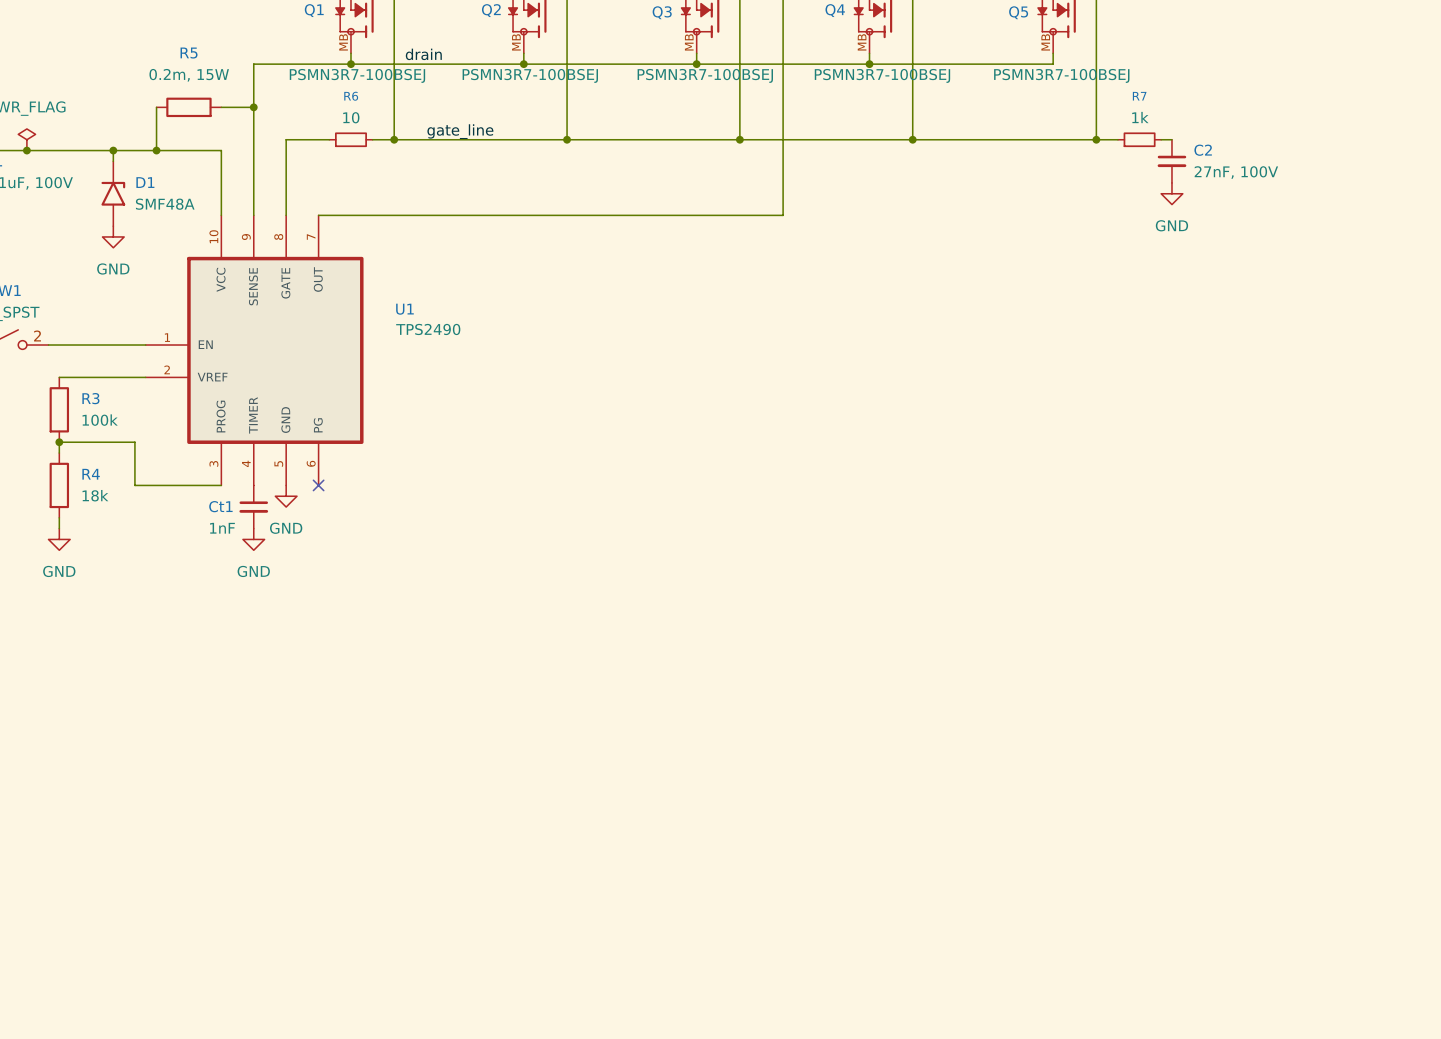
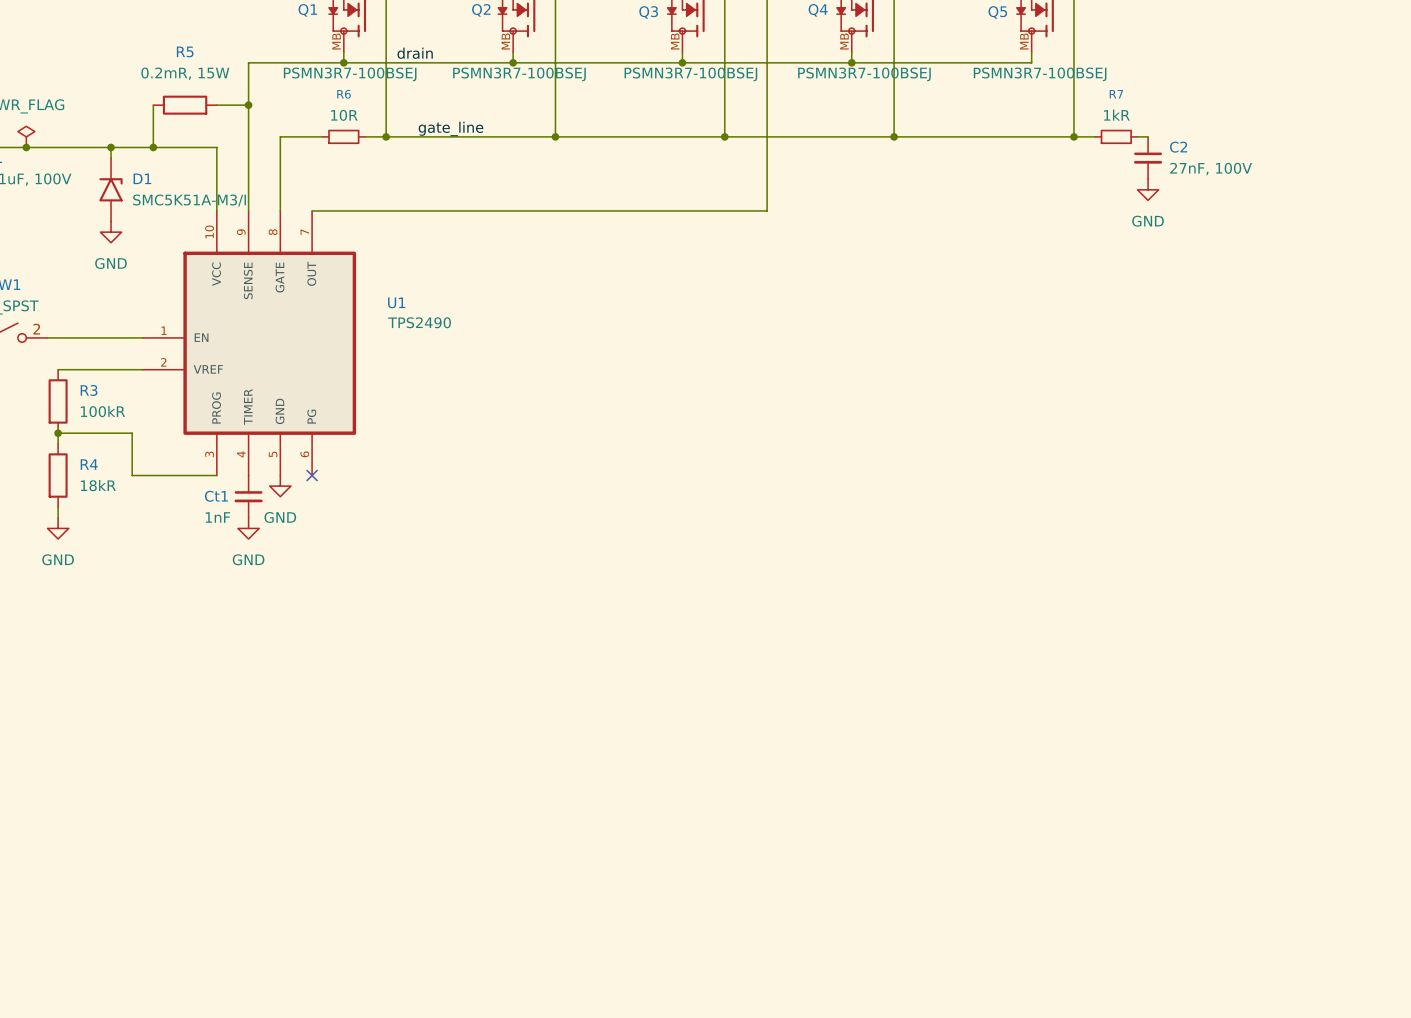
R5 value: 0.2m, 15W (189, 75) -> 0.2mR, 15W (185, 73)
R6 value: 10 (351, 117) -> 10R (344, 115)
R7 value: 1k (1140, 117) -> 1kR (1116, 115)
D1 value: SMF48A (165, 204) -> SMC5K51A-M3/I (189, 200)
R3 value: 100k (100, 420) -> 100kR (102, 411)
R4 value: 18k (95, 495) -> 18kR (98, 485)

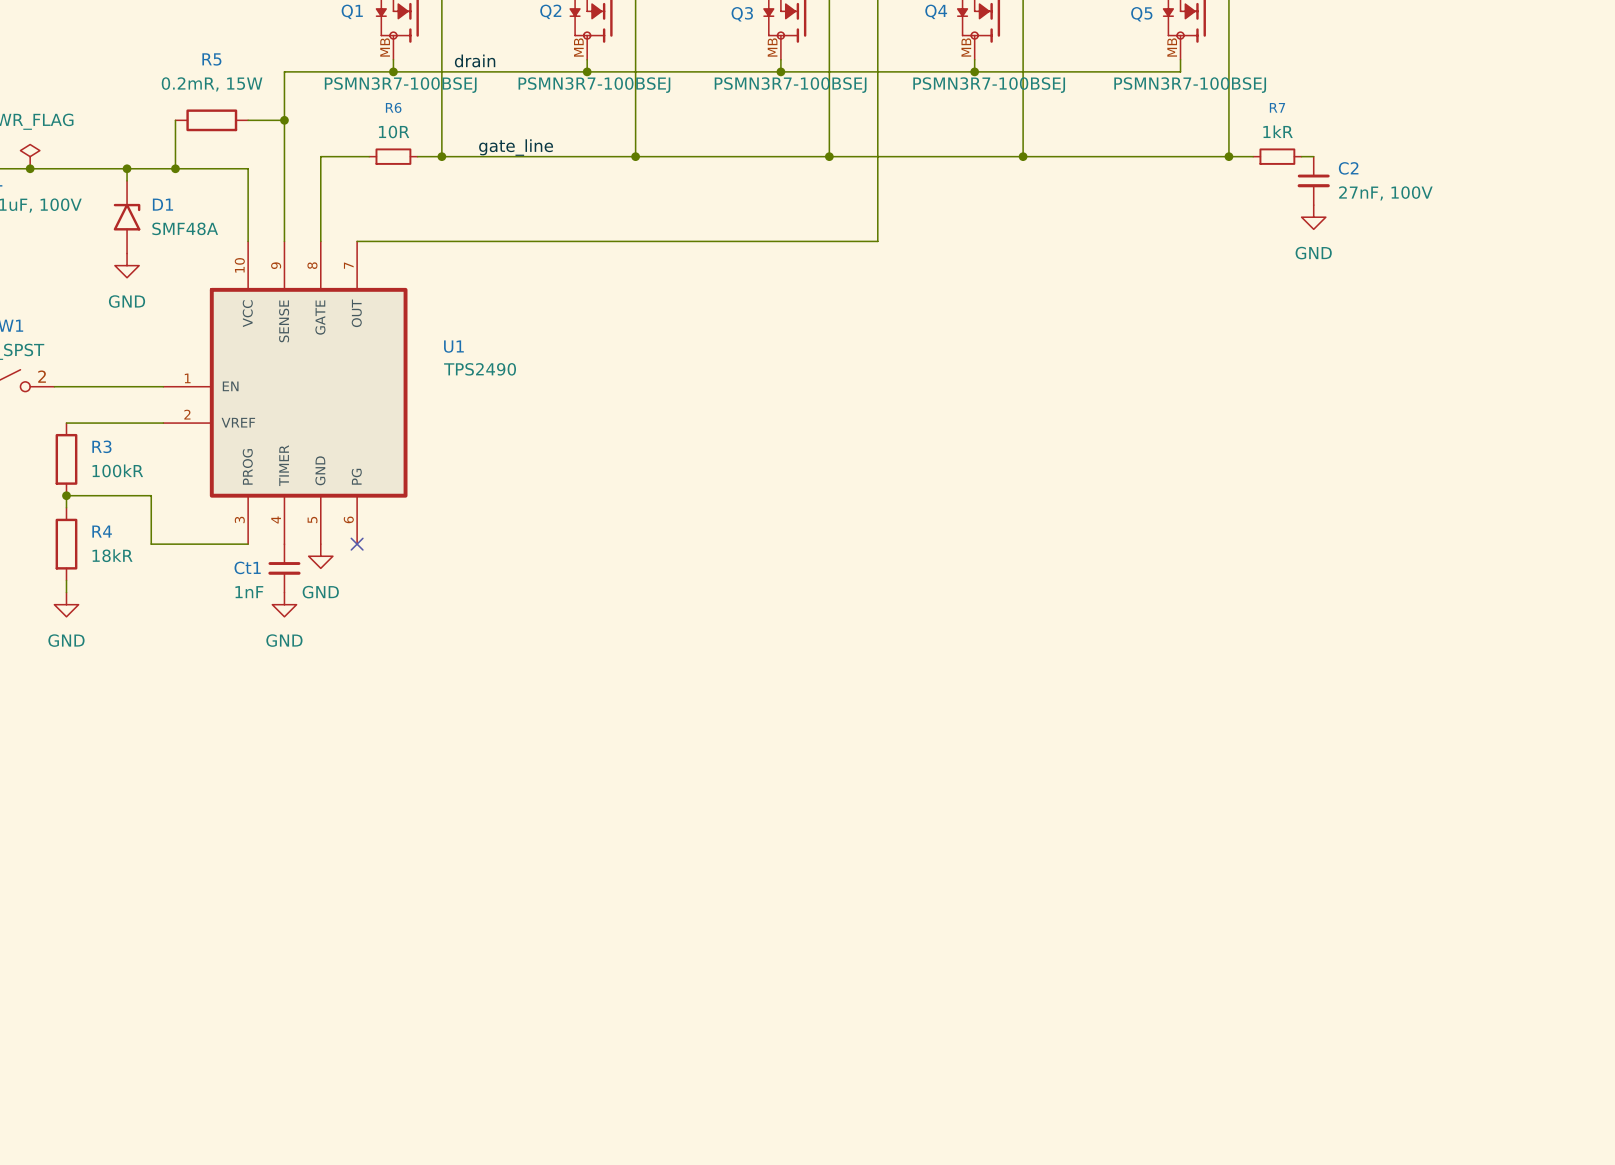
D1 value: SMC5K51A-M3/I (189, 200) -> SMF48A (185, 228)

